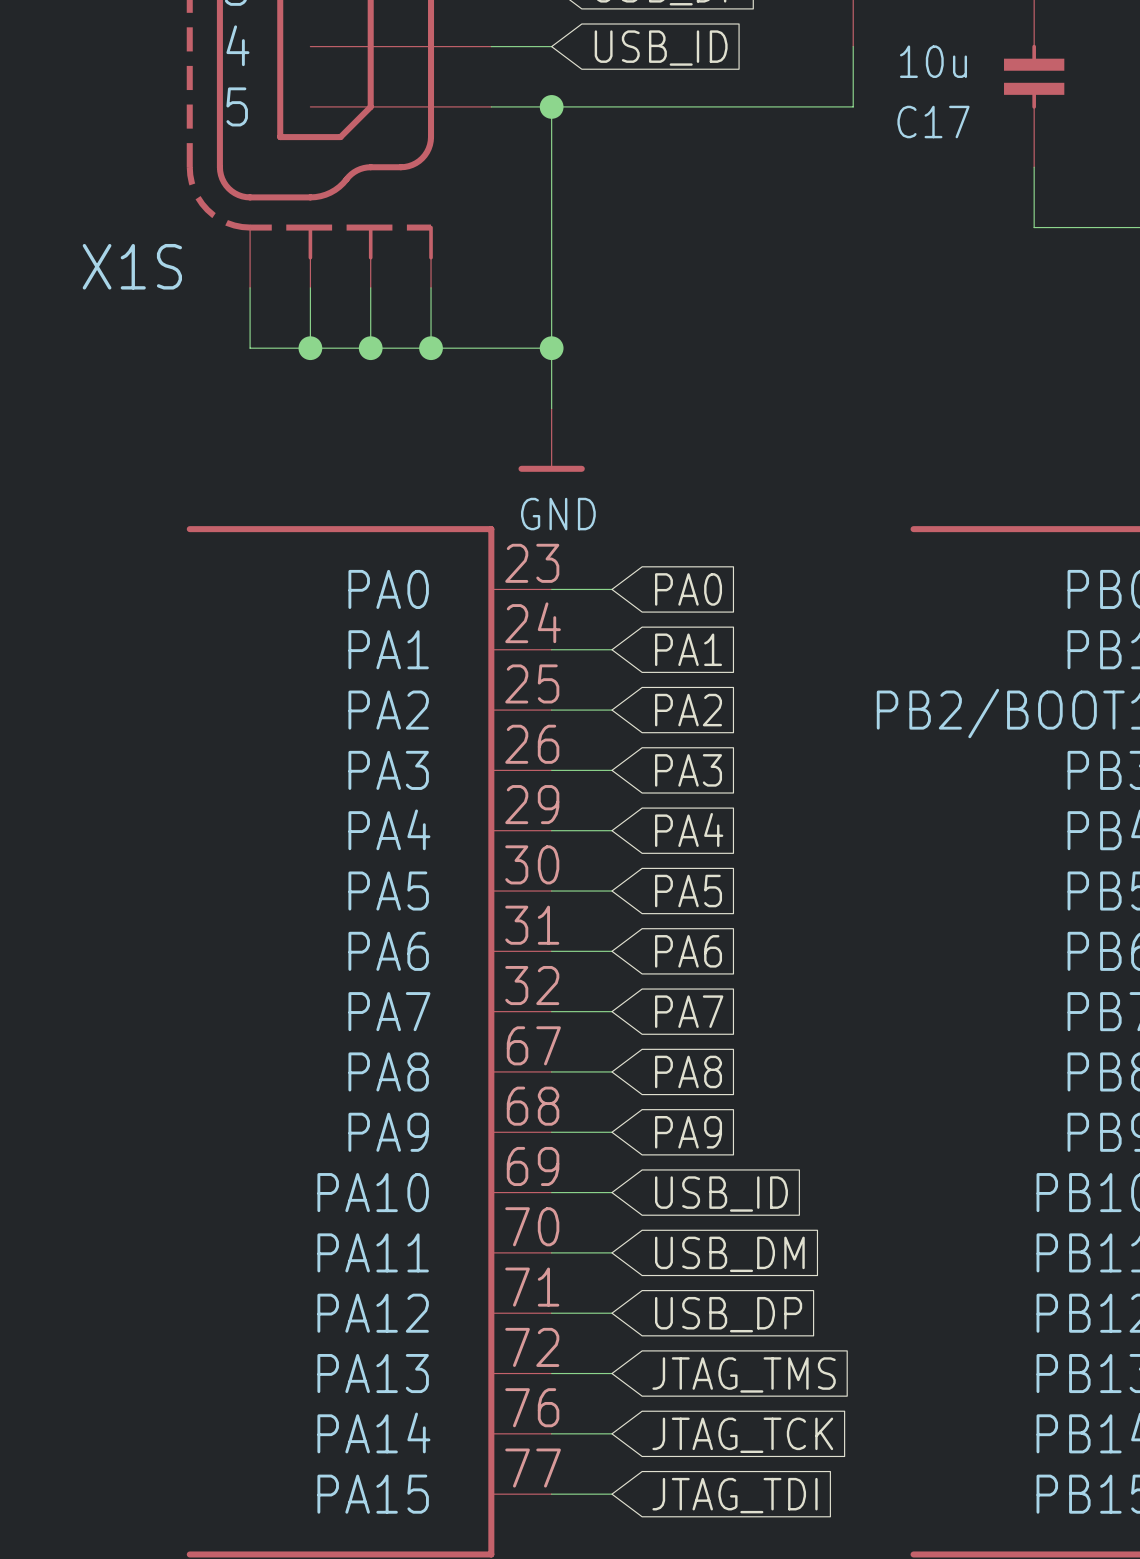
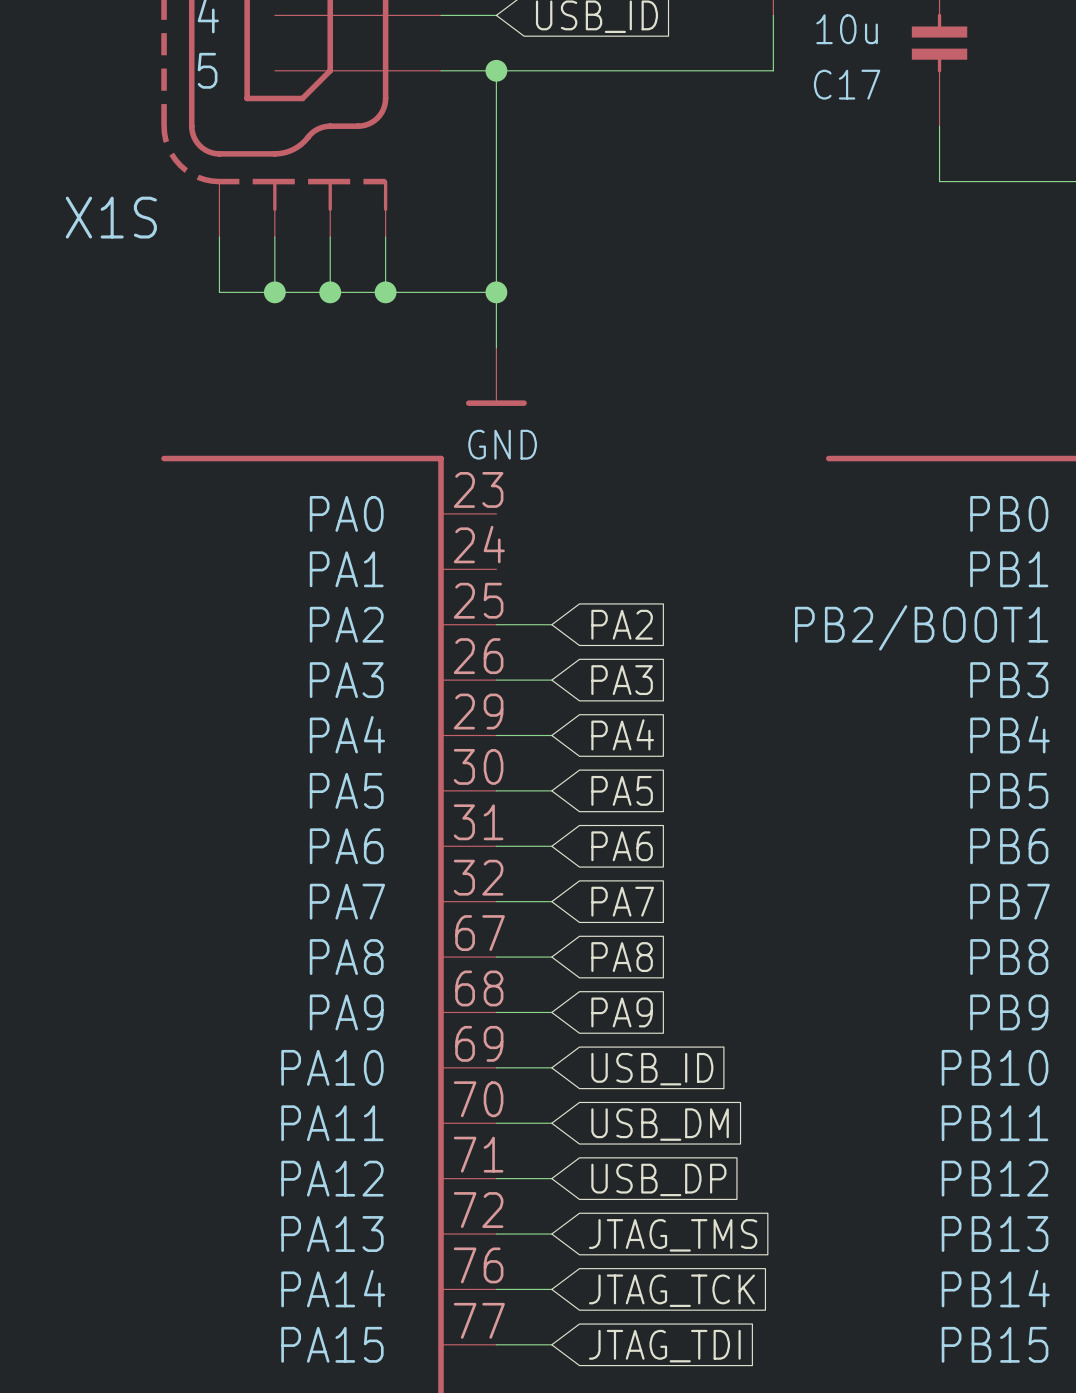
wire: (551, 589) (611, 589) -> none
global label: PA0 (688, 589) -> none
wire: (551, 649) (611, 649) -> none
global label: PA1 (688, 649) -> none

